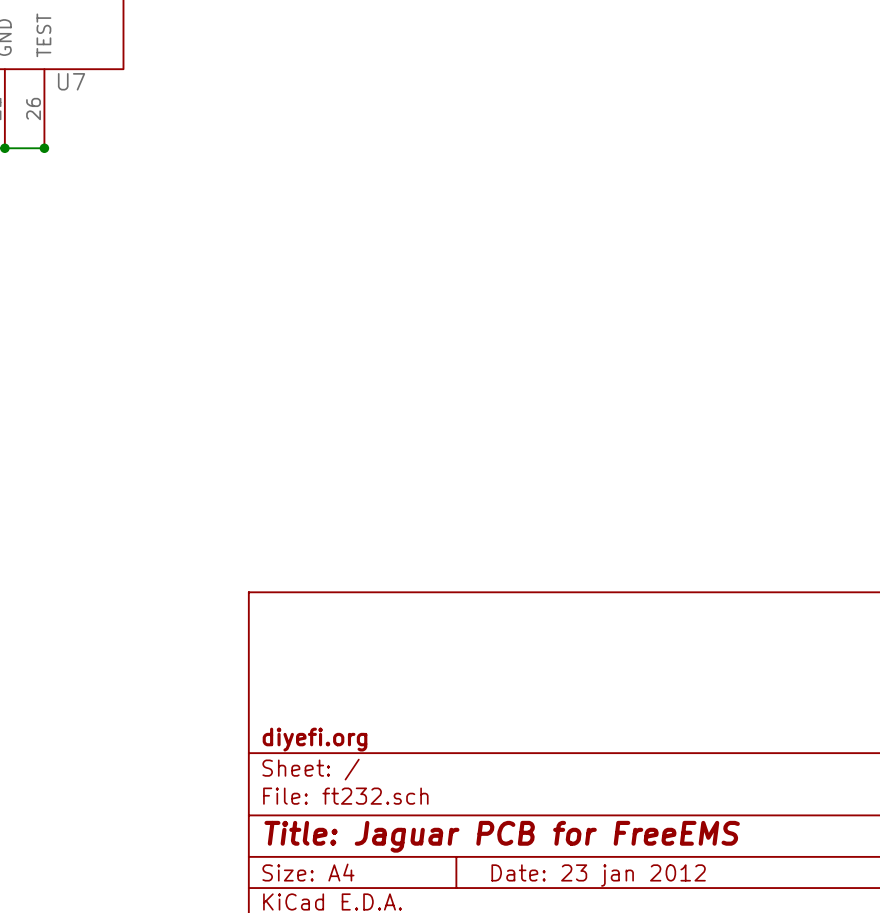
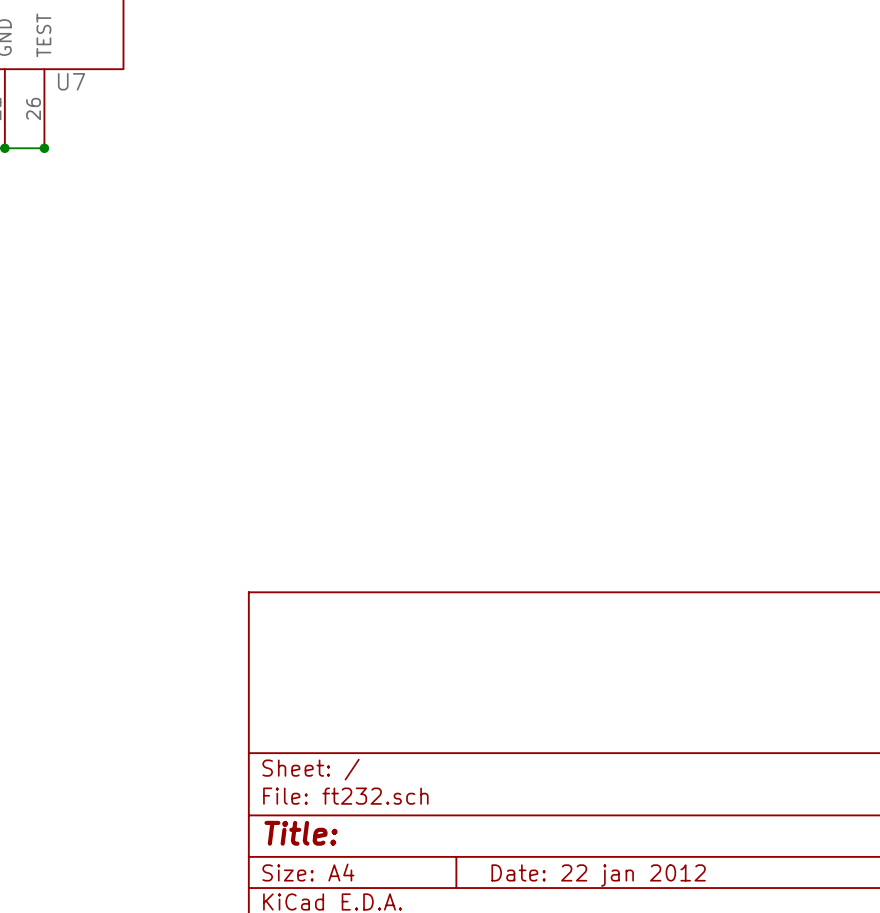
title block: diyefi.org (314, 739) -> none
title block: Title: Jaguar PCB for FreeEMS (502, 836) -> Title: (301, 833)
title block: Date: 23 jan 2012 (598, 875) -> Date: 22 jan 2012 (598, 875)

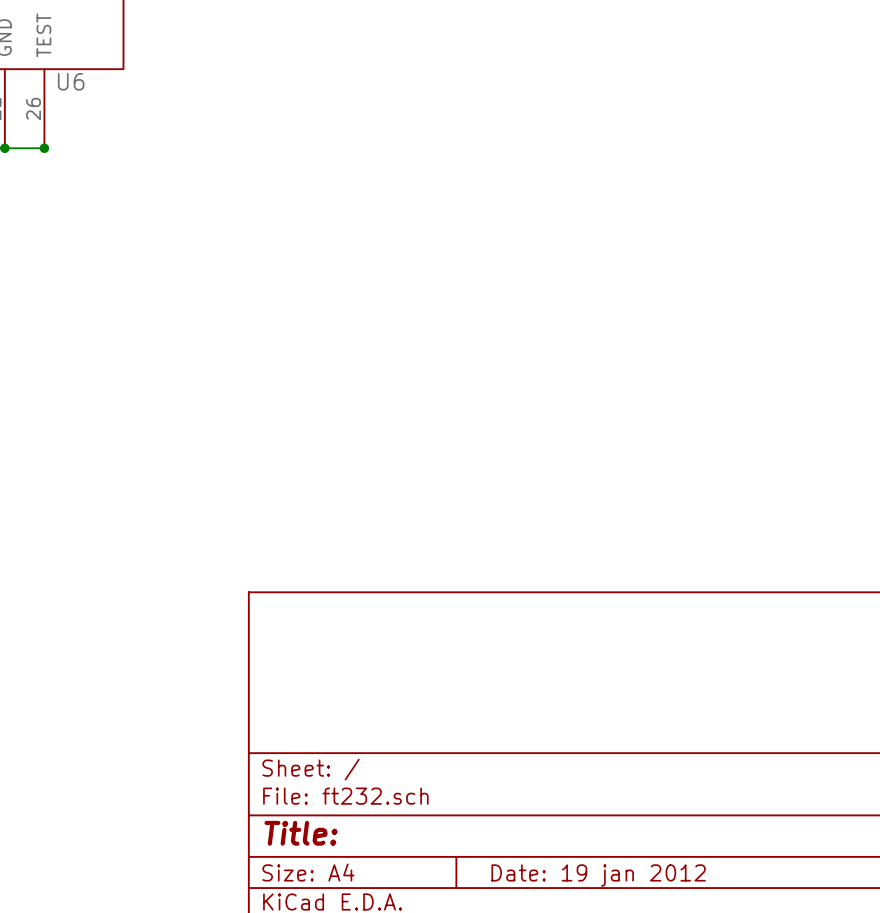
U7 name: U7 (71, 81) -> U6 (71, 81)
title block: Date: 22 jan 2012 (598, 875) -> Date: 19 jan 2012 (598, 875)

